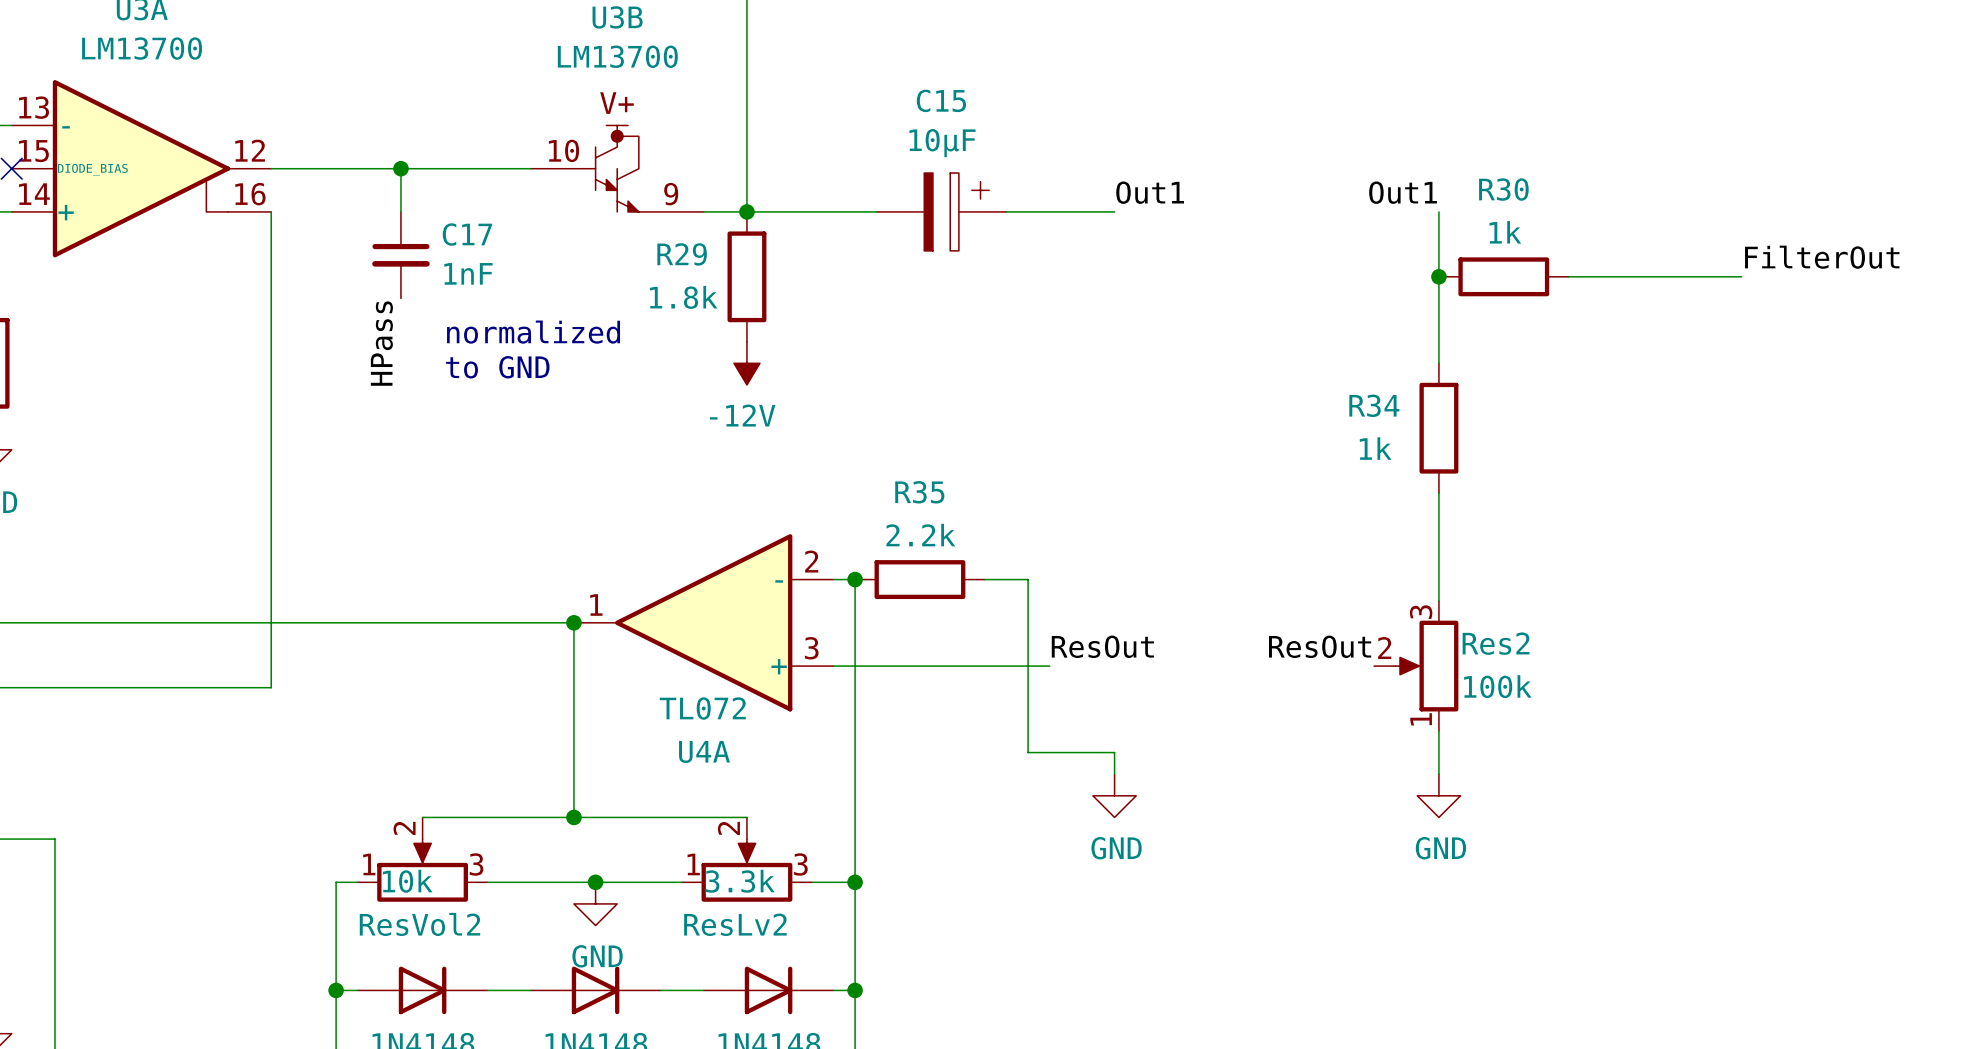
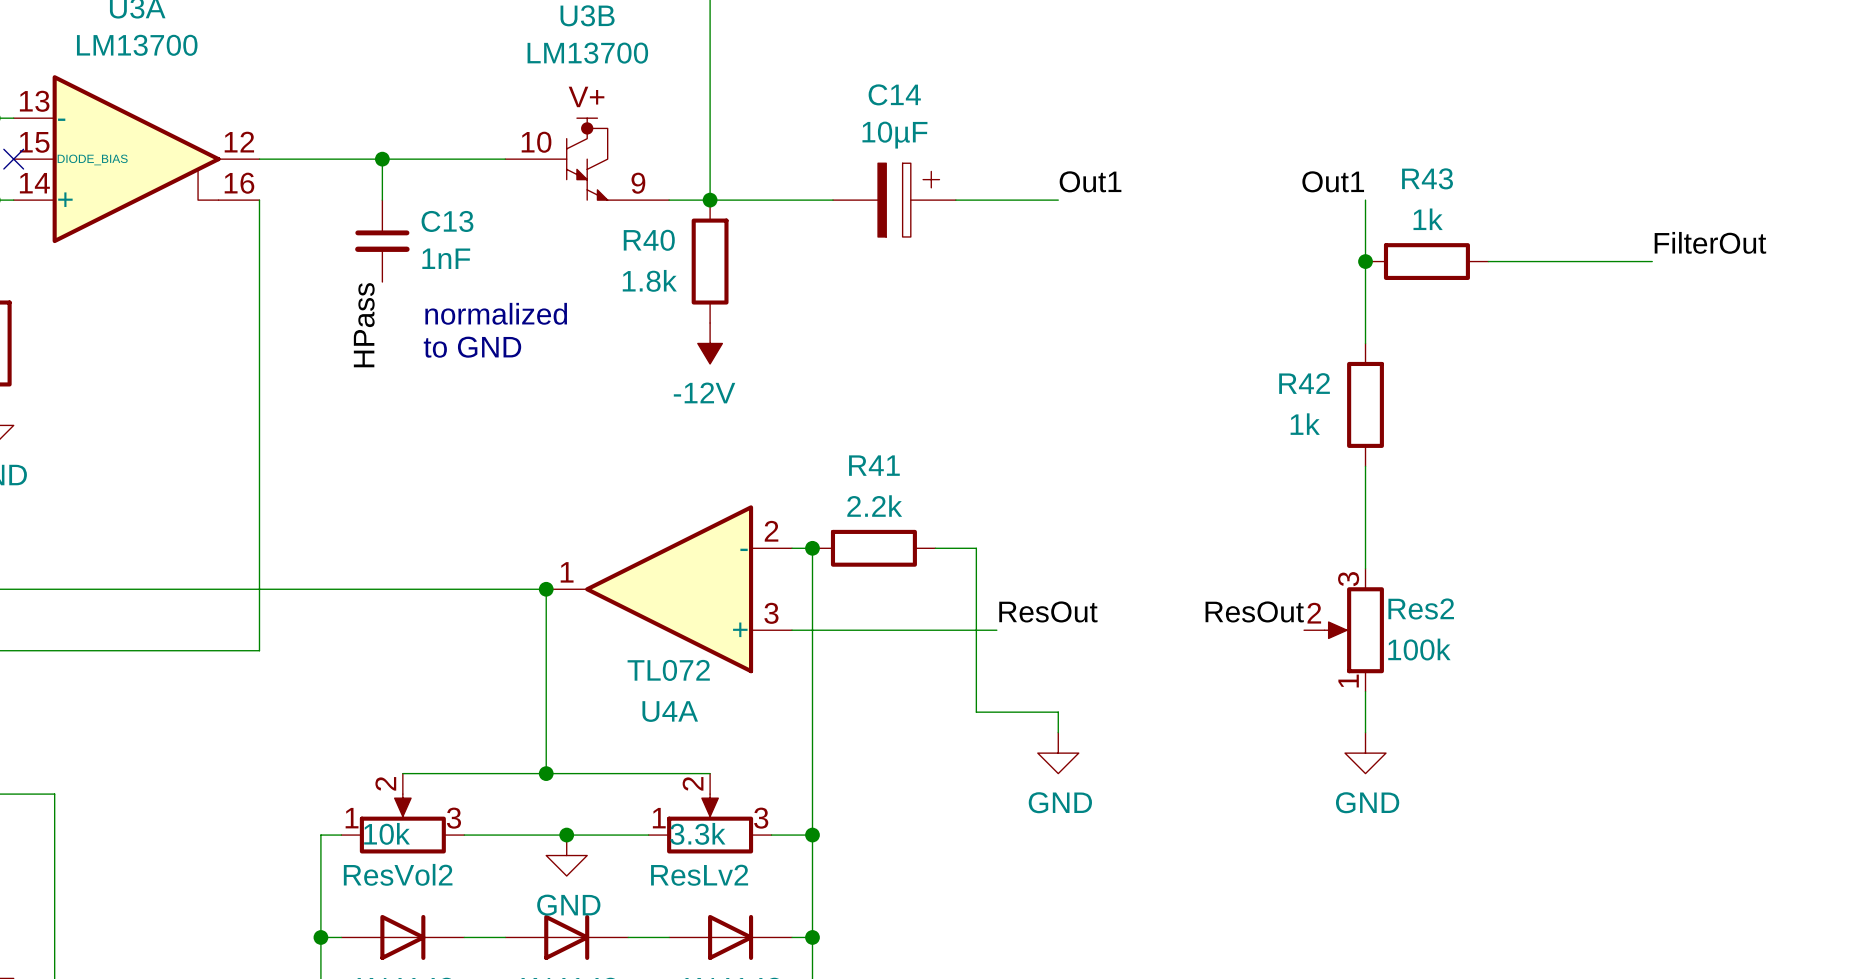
C15 name: C15 (941, 100) -> C14 (894, 94)
R30 name: R30 (1503, 189) -> R43 (1427, 178)
C17 name: C17 (467, 234) -> C13 (447, 221)
R29 name: R29 (682, 254) -> R40 (649, 240)
R34 name: R34 (1374, 405) -> R42 (1304, 383)
R35 name: R35 (919, 492) -> R41 (874, 465)

